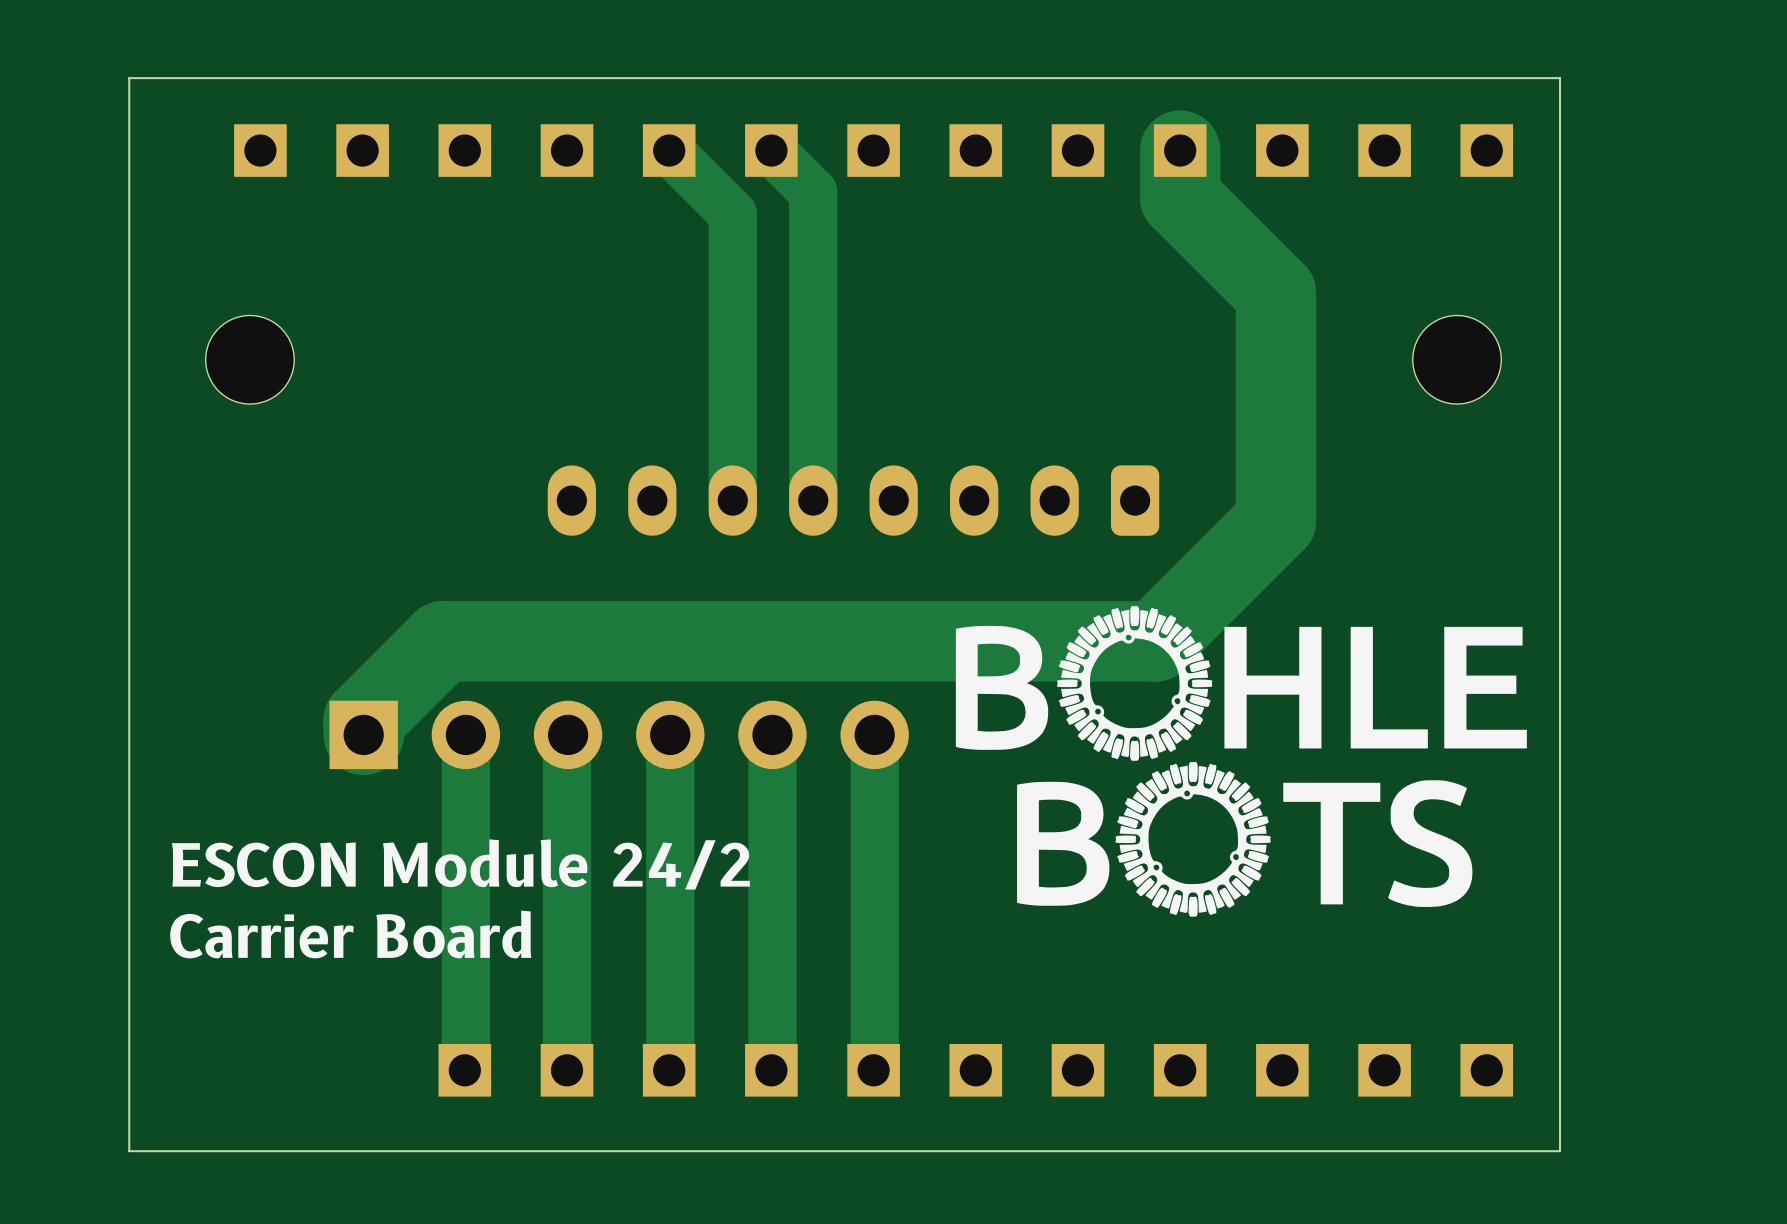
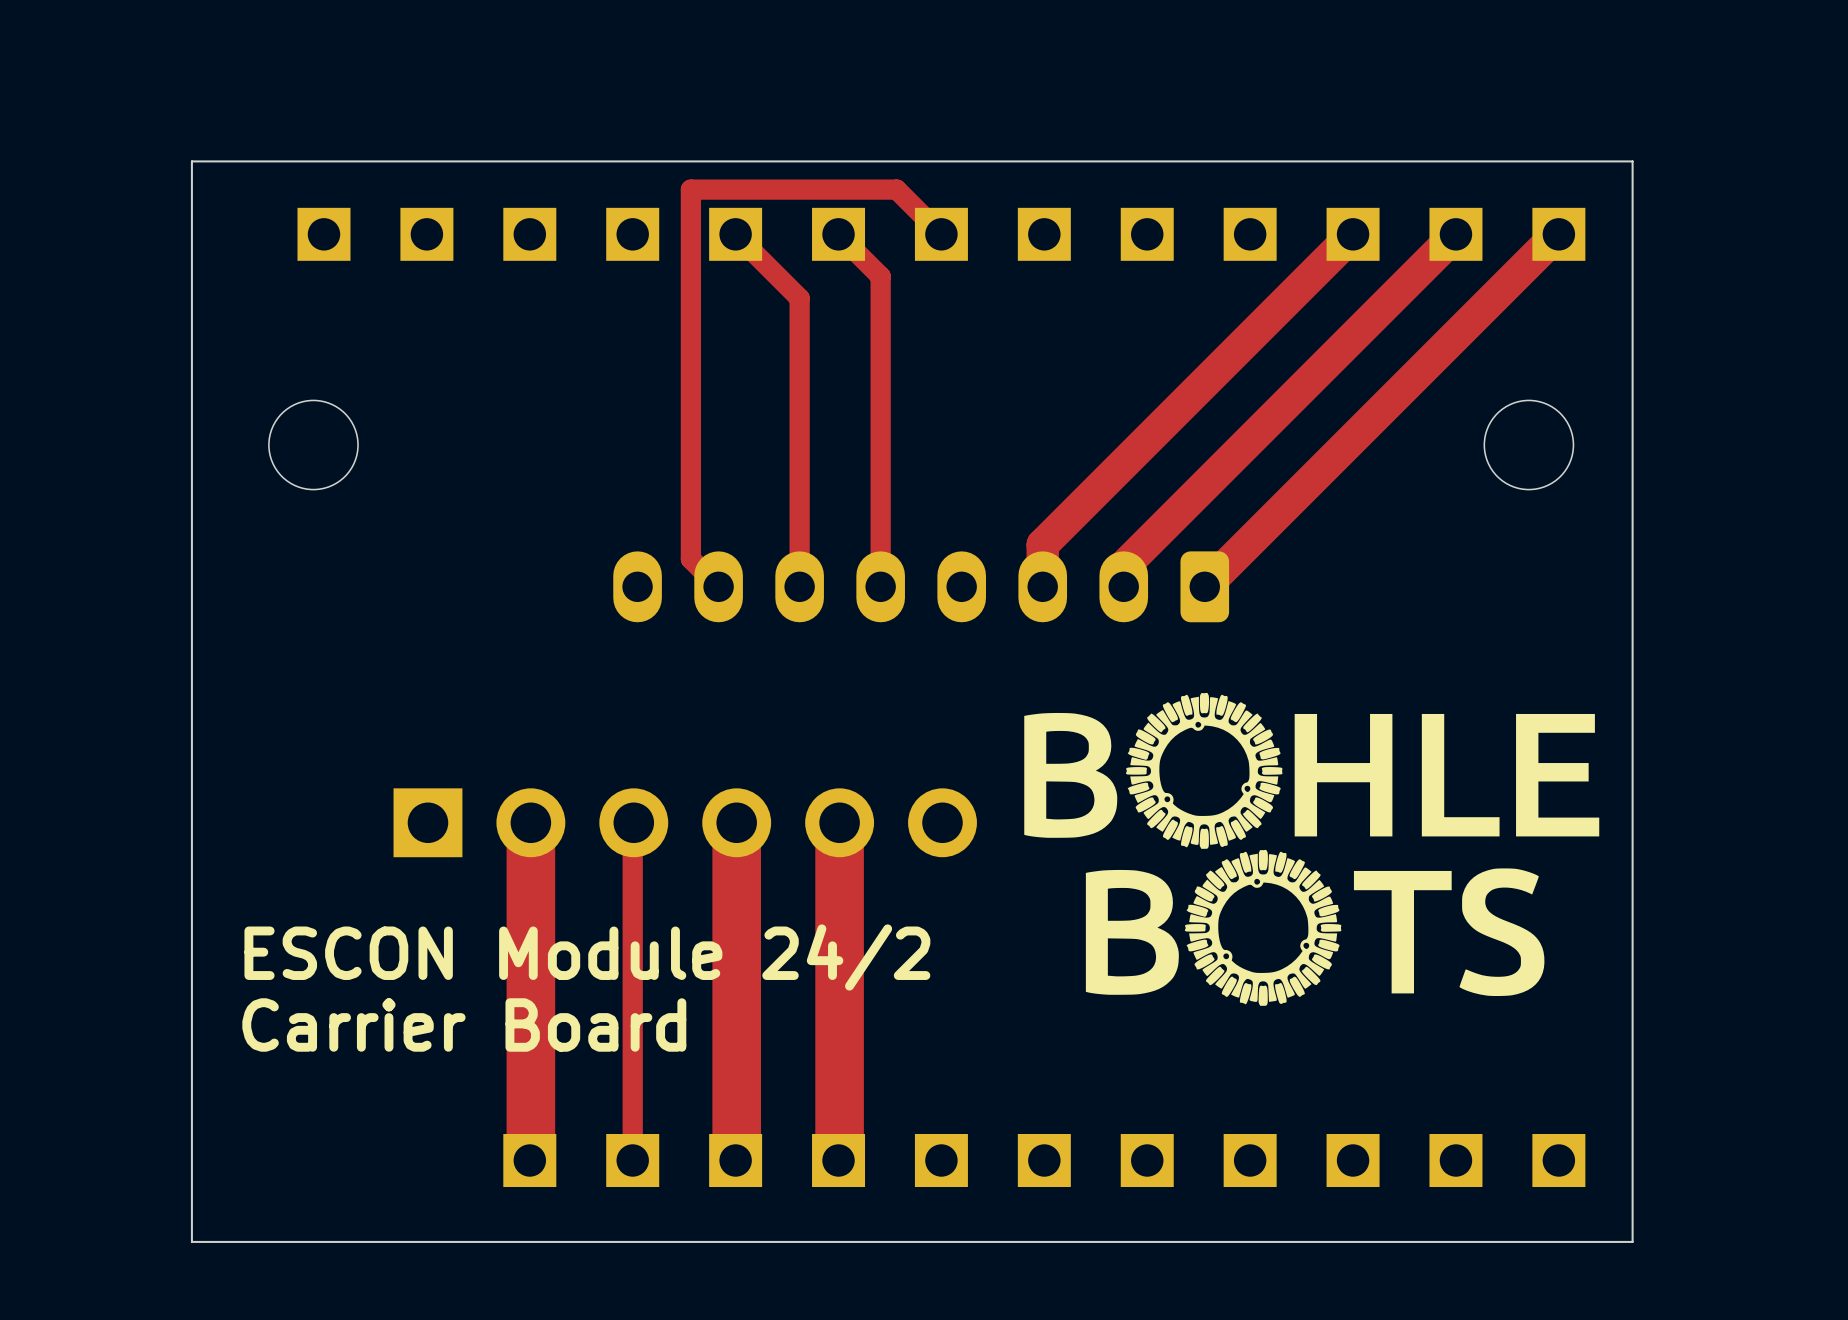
track width: thick (669, 150) (732, 214) (732, 500) -> thin (735, 234) (799, 298) (799, 586)
track width: thick (771, 150) (813, 192) (813, 500) -> thin (838, 234) (880, 276) (880, 586)
track: none -> (941, 234) (896, 189) (690, 189) (690, 559) (718, 586)
track: (1180, 150) (1180, 197) (1275, 293) (1275, 520) (1155, 641) (442, 641) (363, 720) (363, 734) -> none
track: none -> (1353, 234) (1042, 544) (1042, 586)
track: none -> (1455, 234) (1123, 566) (1123, 586)
track: none -> (1558, 234) (1204, 586)
track width: thick (568, 734) (567, 1070) -> thin (633, 822) (632, 1160)
track: (874, 734) (873, 1070) -> none

